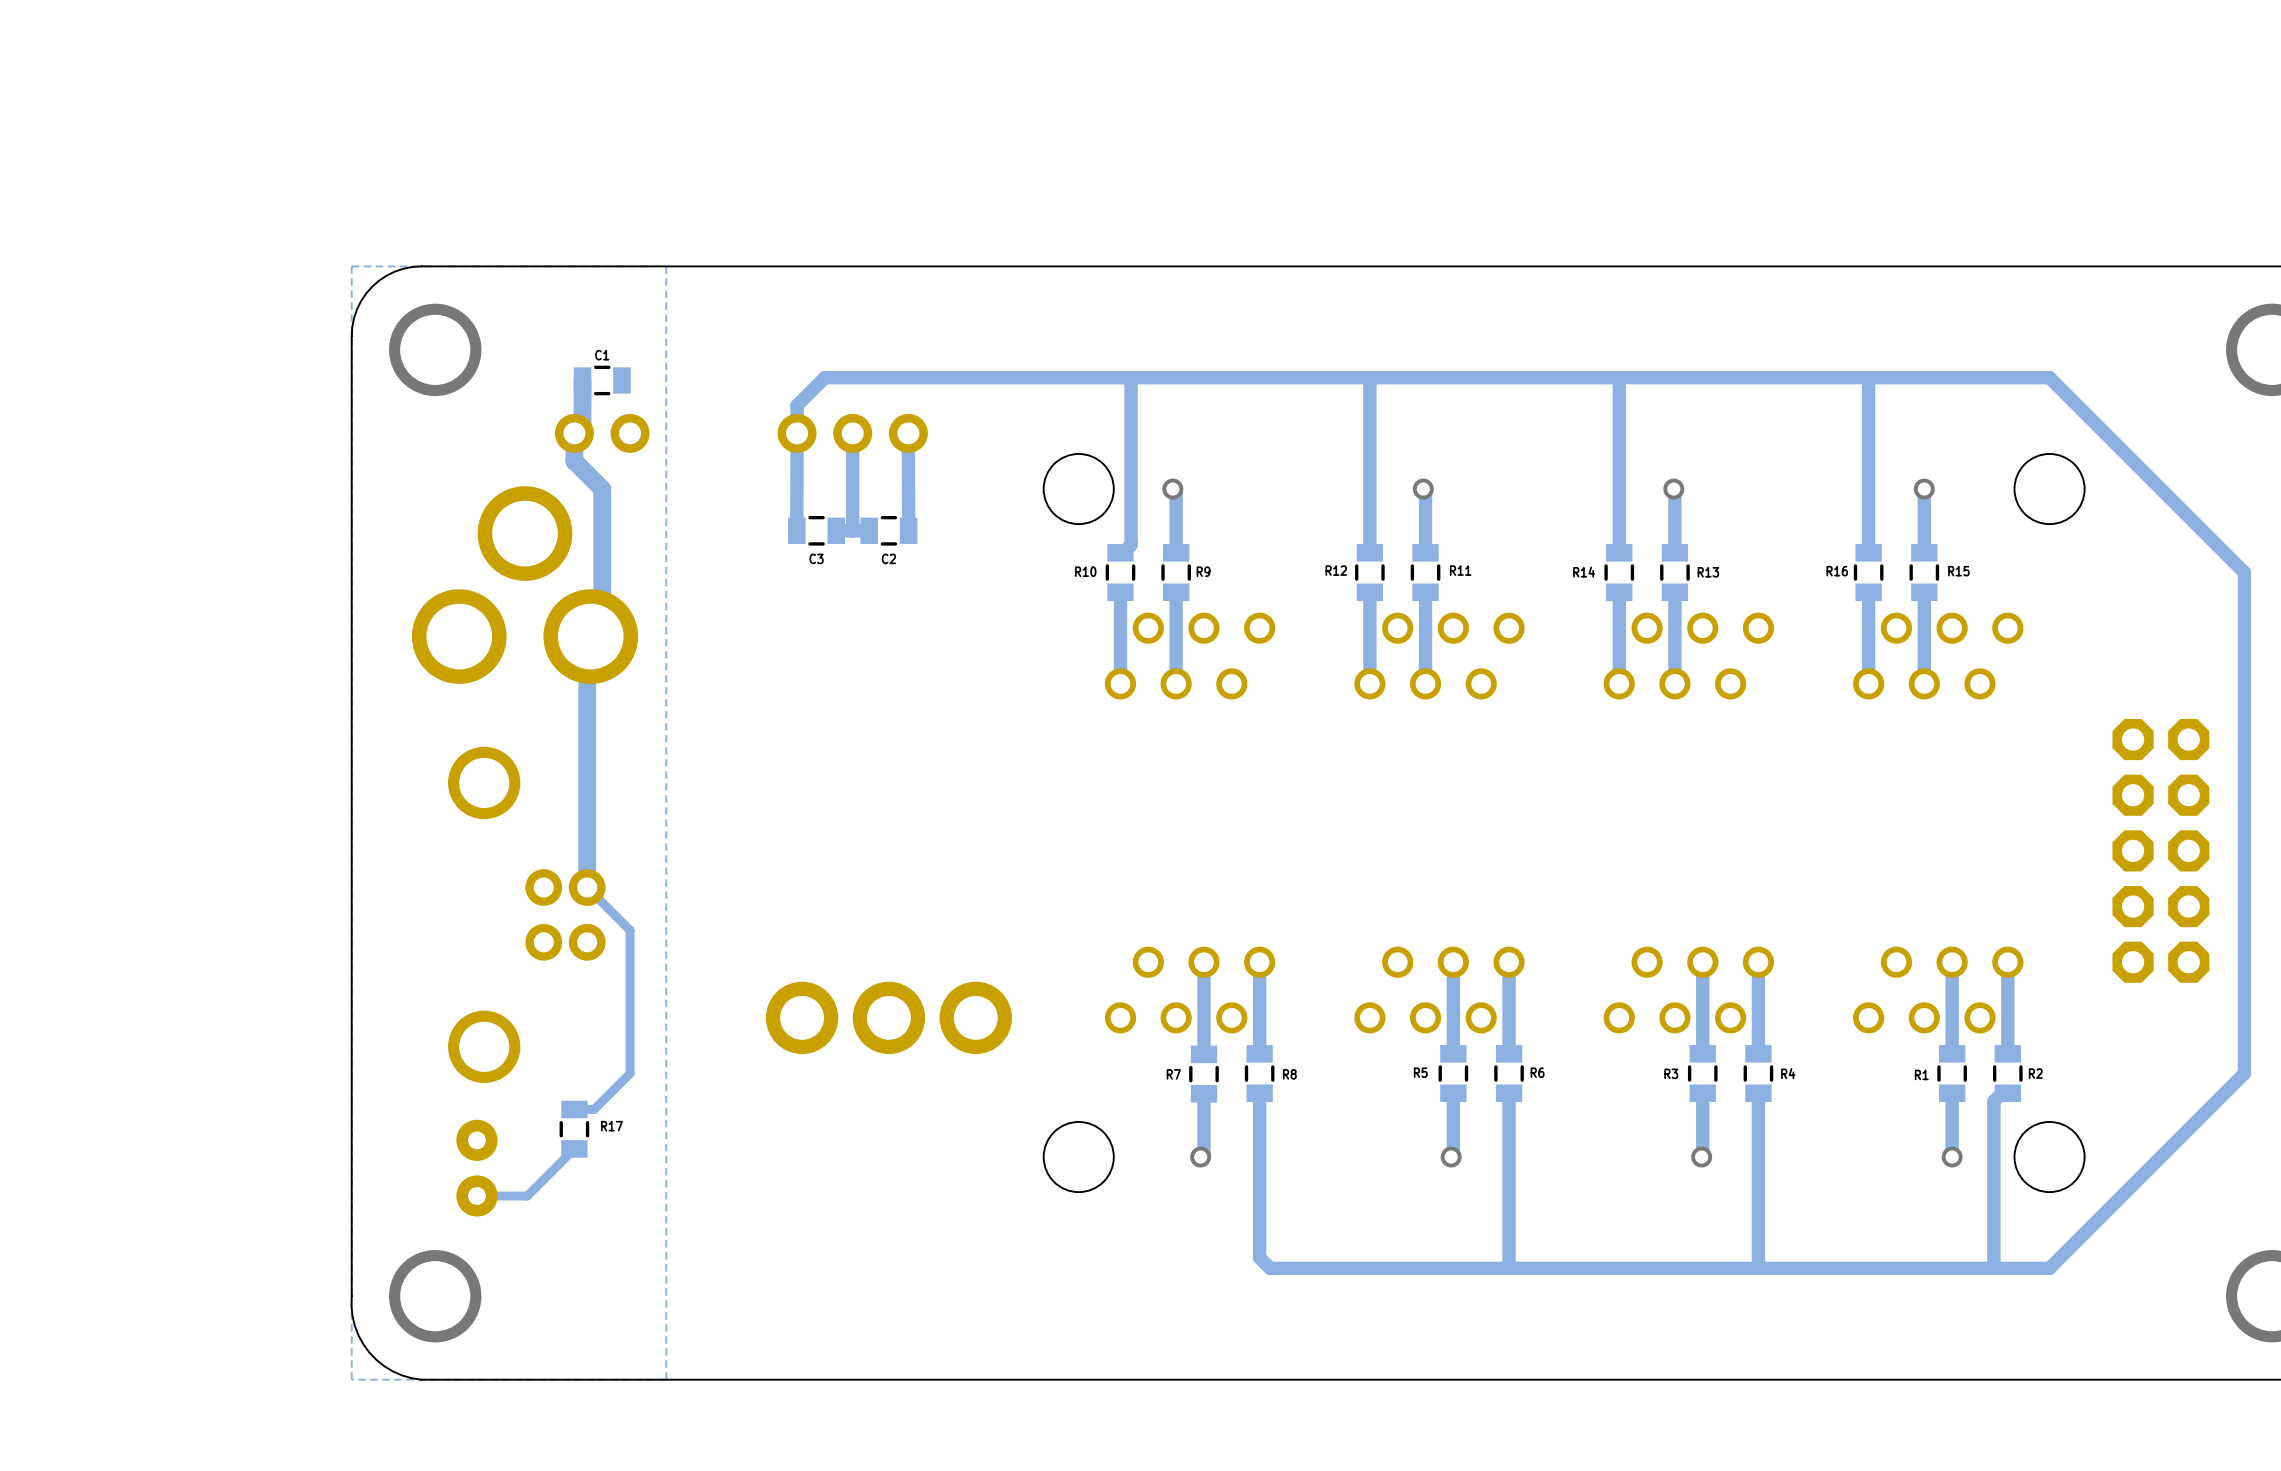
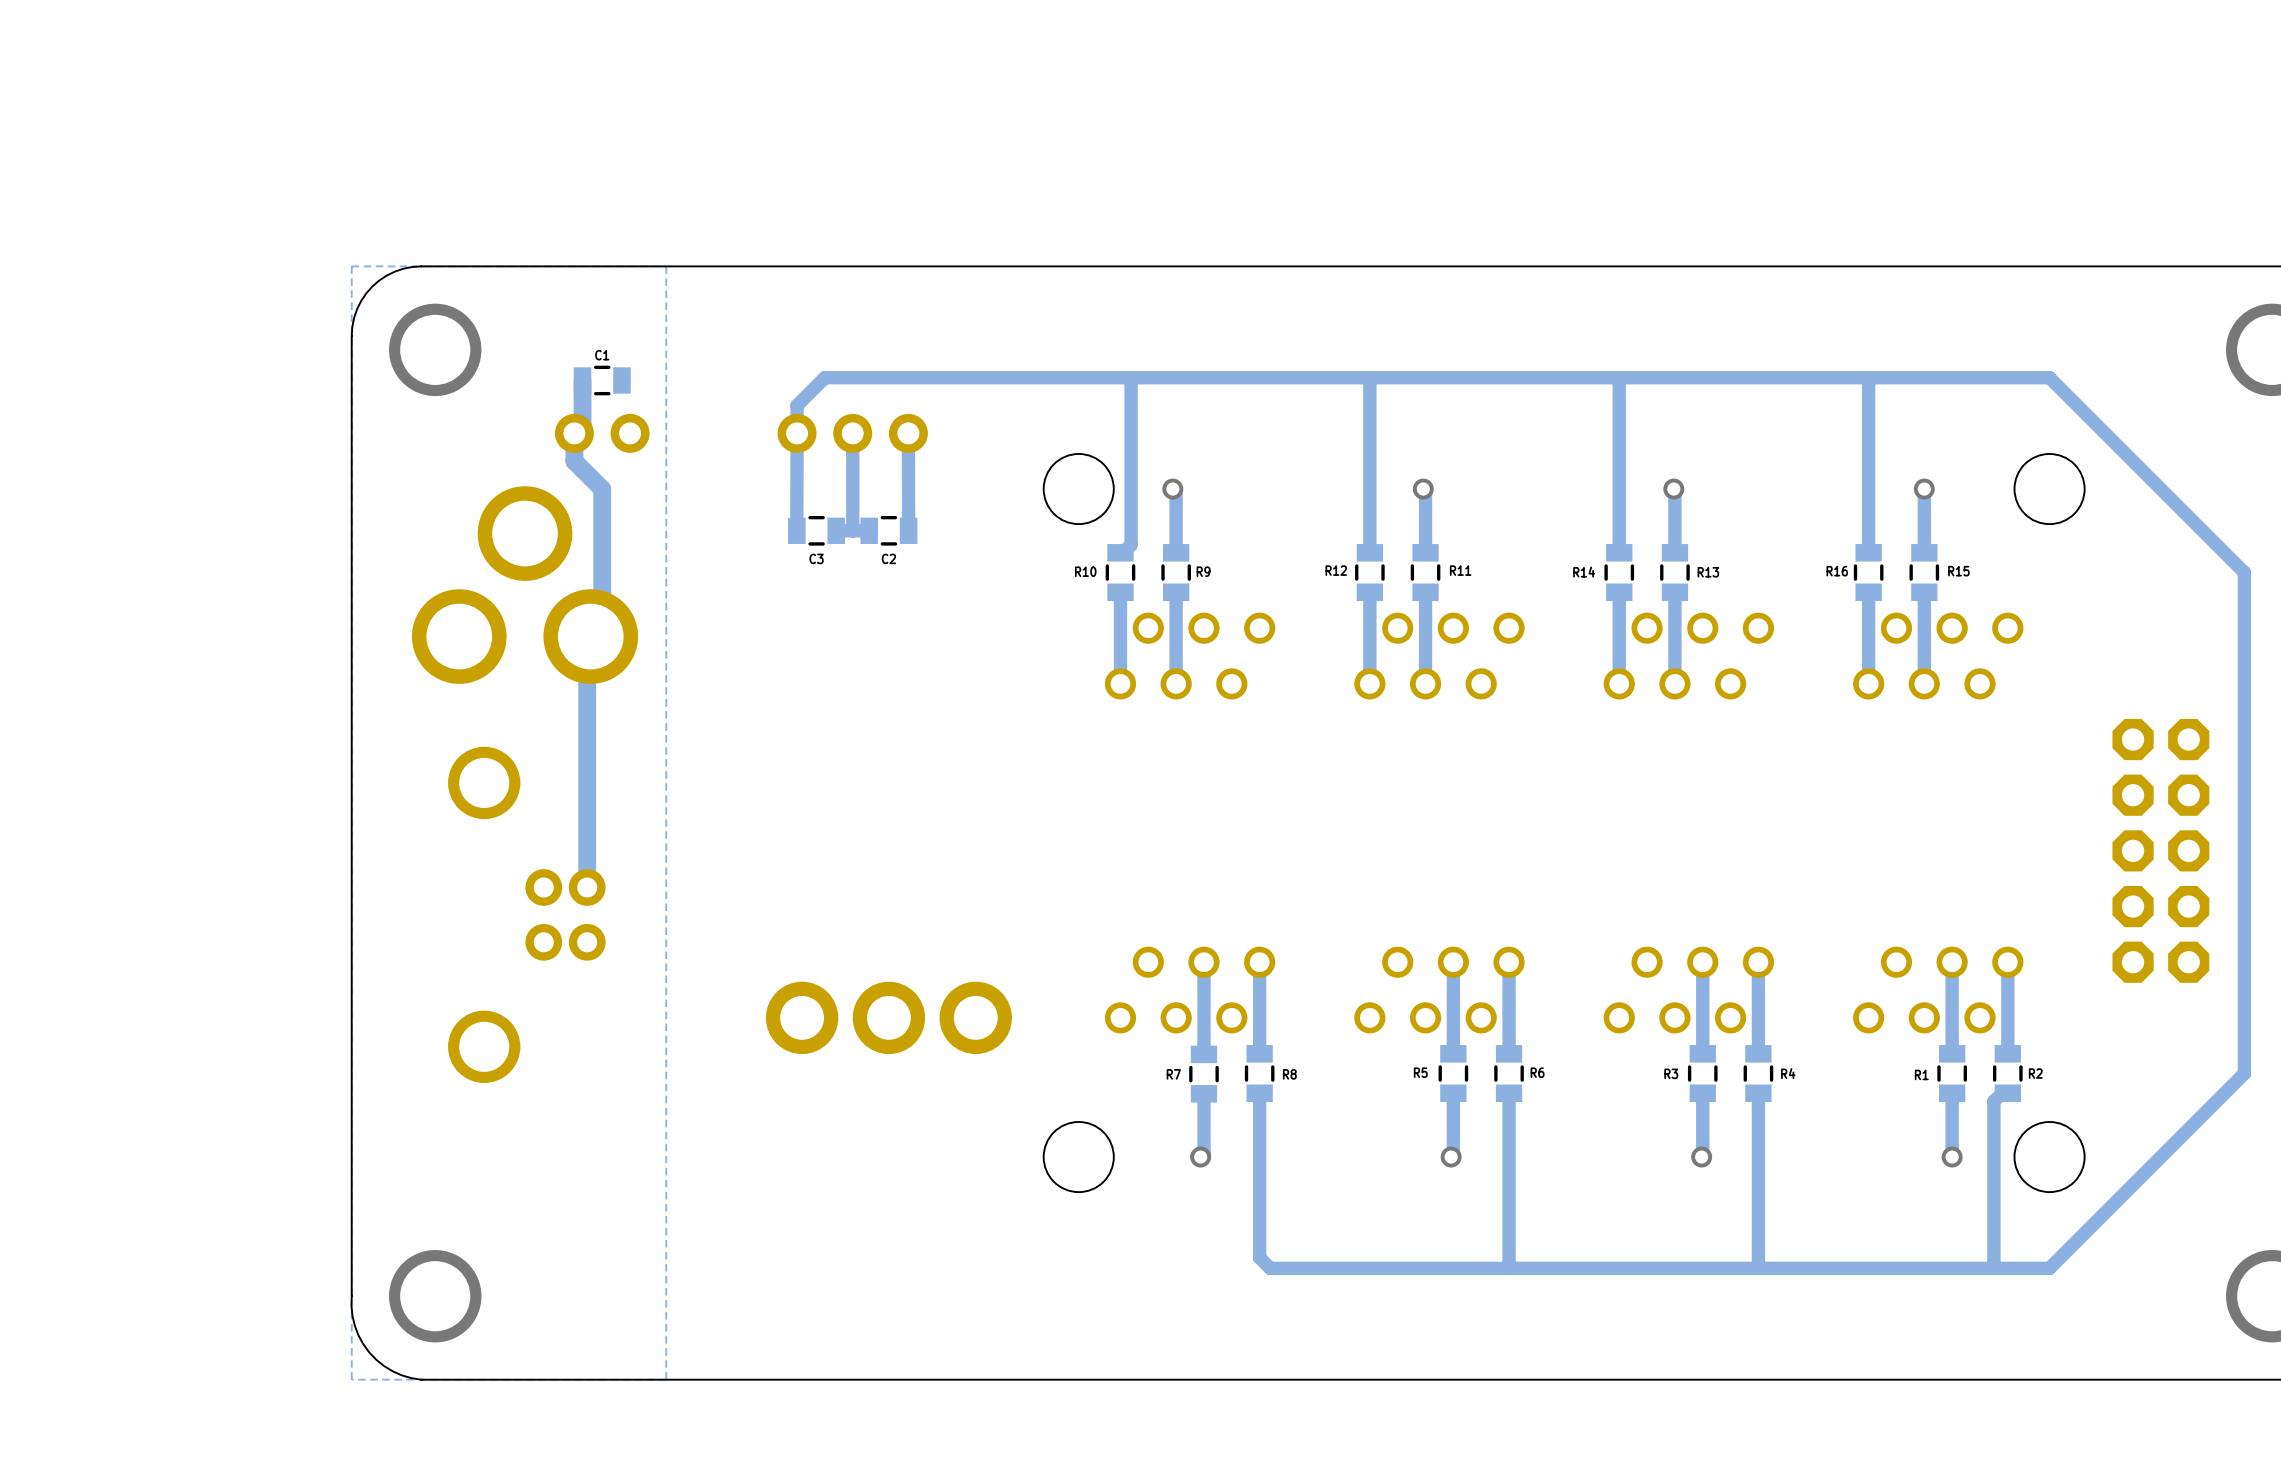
track: (587, 887) (630, 930) (630, 1073) (594, 1109) (574, 1109) -> none
R17: (574, 1129) -> none
track: (574, 1148) (527, 1196) (476, 1196) -> none
part: (476, 1168) -> none

